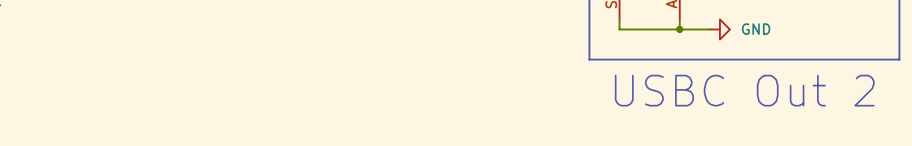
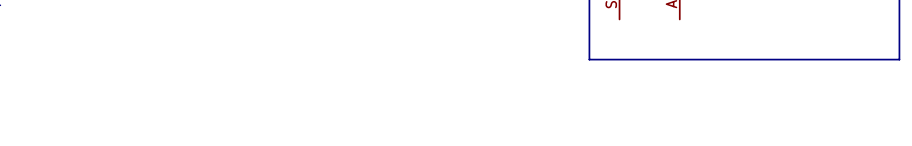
wire: (619, 19) (619, 29) (709, 29) -> none
wire: (679, 19) (679, 29) -> none
junction: (679, 29) -> none
power symbol: GND (719, 29) -> none
text: USBC Out 2 (744, 90) -> none

